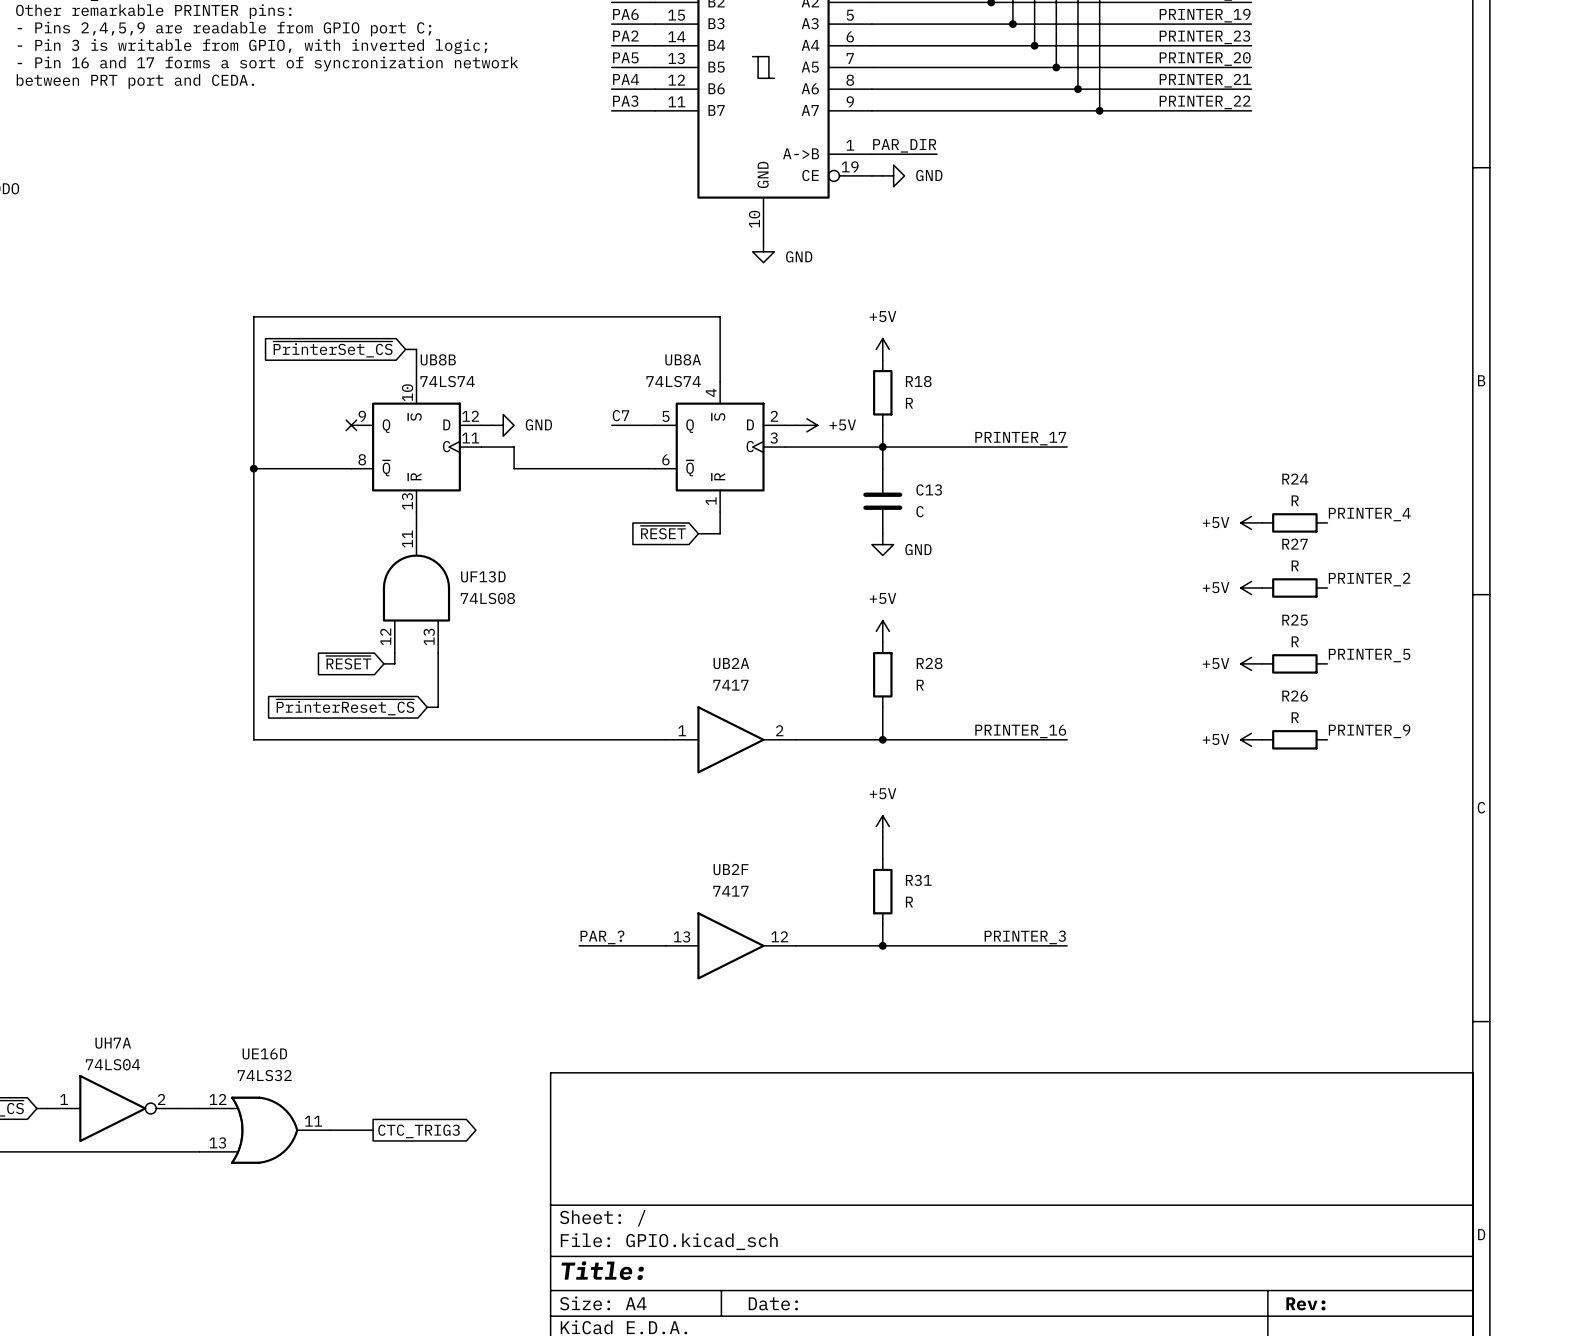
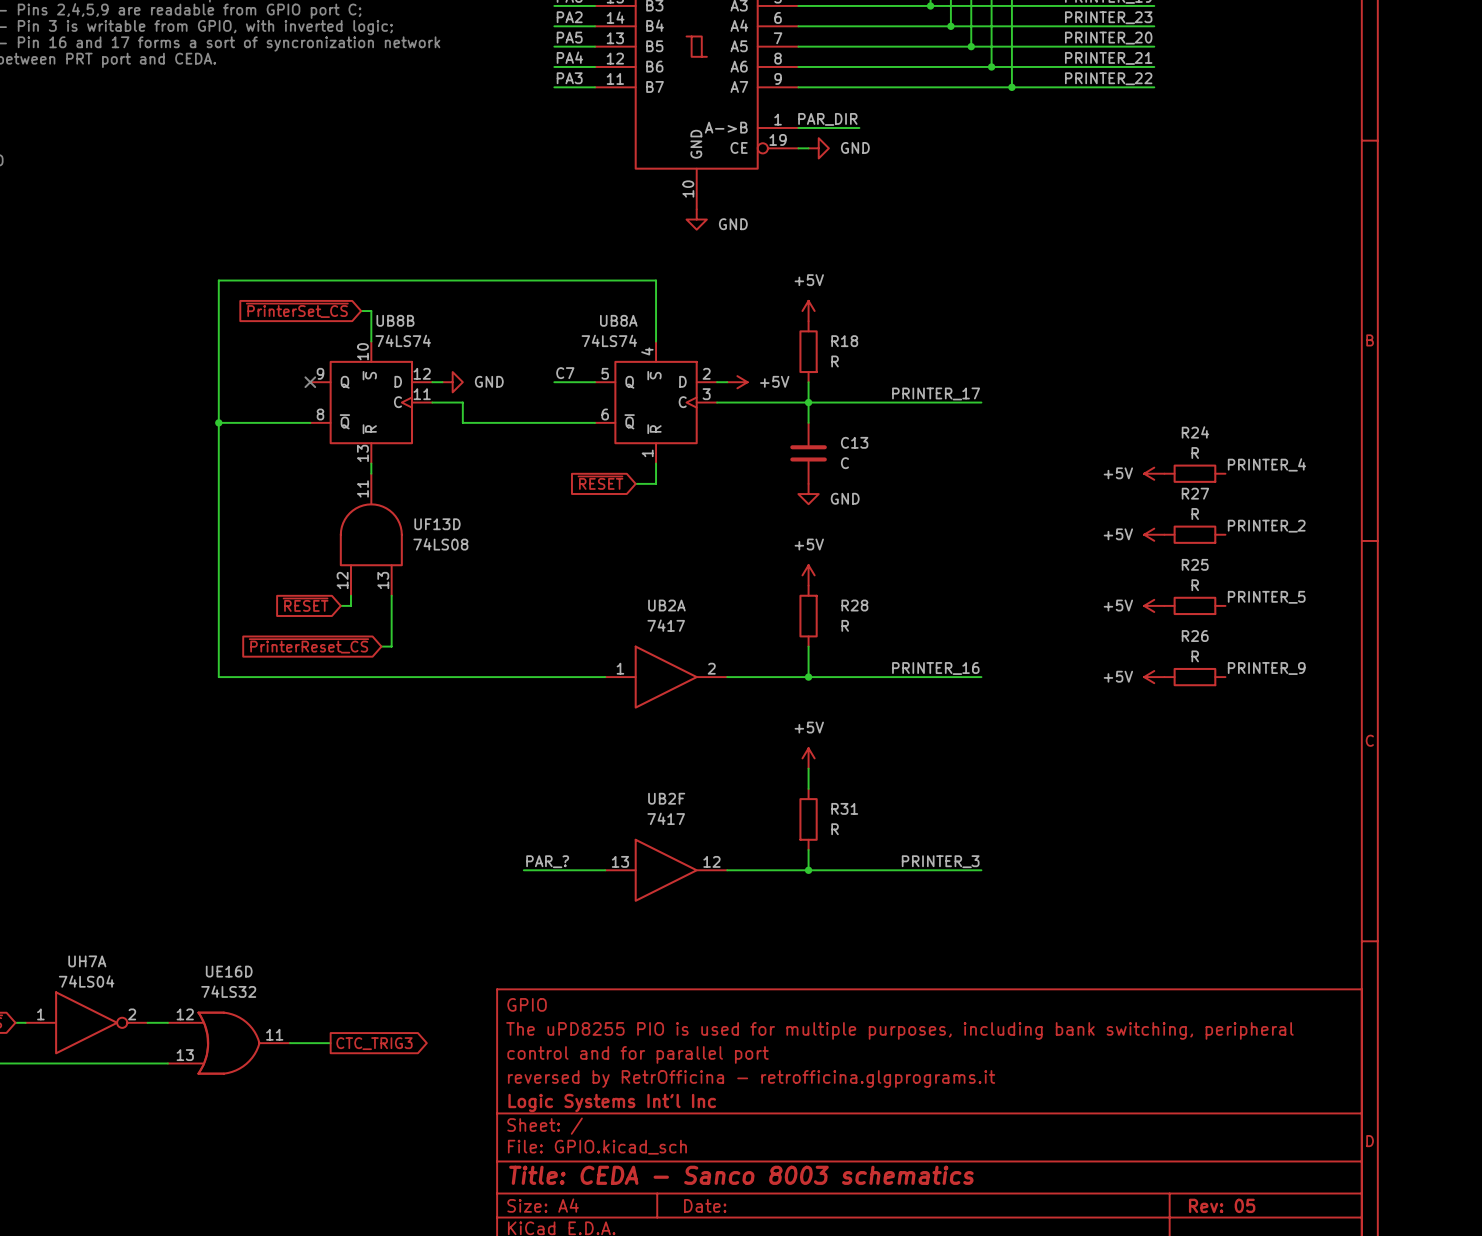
title block: none -> GPIO (527, 1004)
title block: none -> The uPD8255 PIO is used for multiple purposes, including bank switching, peripheral (899, 1030)
title block: none -> control and for parallel port (638, 1054)
title block: none -> reversed by RetrOfficina - retrofficina.glgprograms.it (751, 1078)
title block: none -> Logic Systems Int'l Inc (612, 1102)
title block: Title: (602, 1270) -> Title: CEDA - Sanco 8003 schematics (741, 1175)
title block: Rev: (1305, 1303) -> Rev: 05 (1222, 1205)

